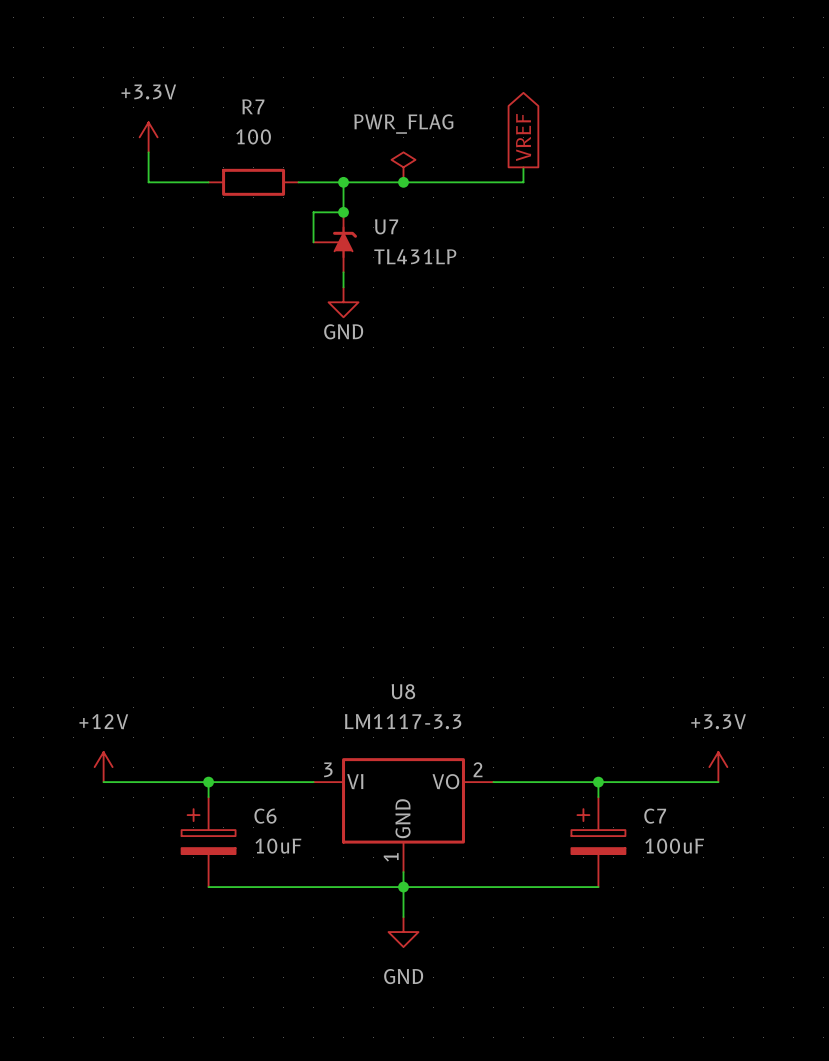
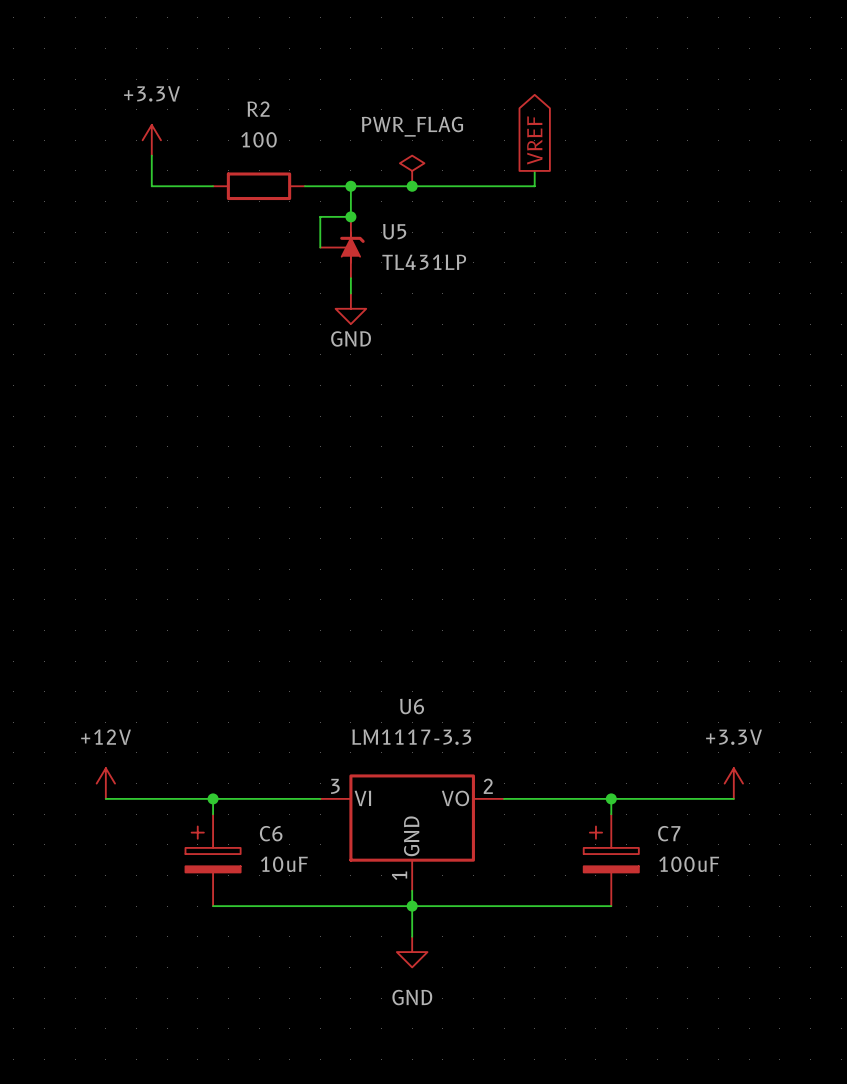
R7 name: R7 (253, 106) -> R2 (258, 109)
U7 name: U7 (386, 226) -> U5 (394, 231)
U8 name: U8 (403, 691) -> U6 (412, 706)

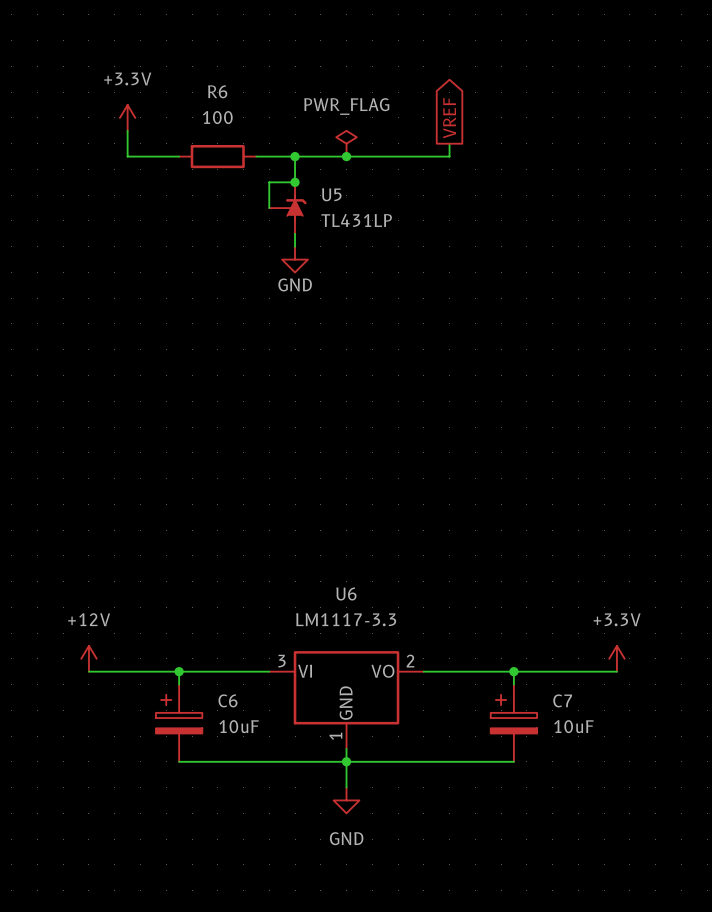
R2 name: R2 (258, 109) -> R6 (217, 91)
C7 value: 100uF (689, 864) -> 10uF (573, 726)

